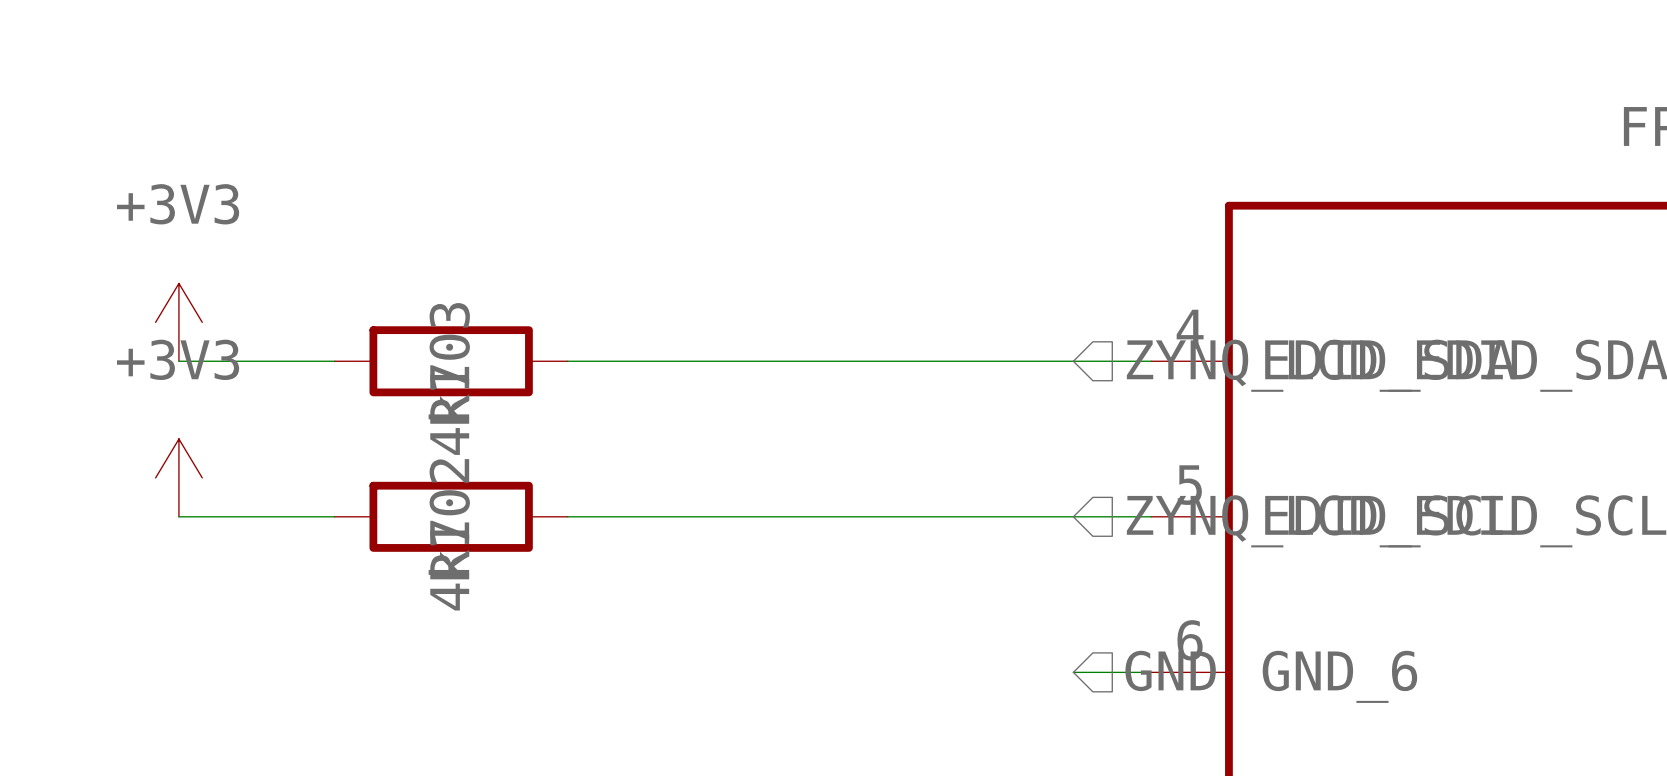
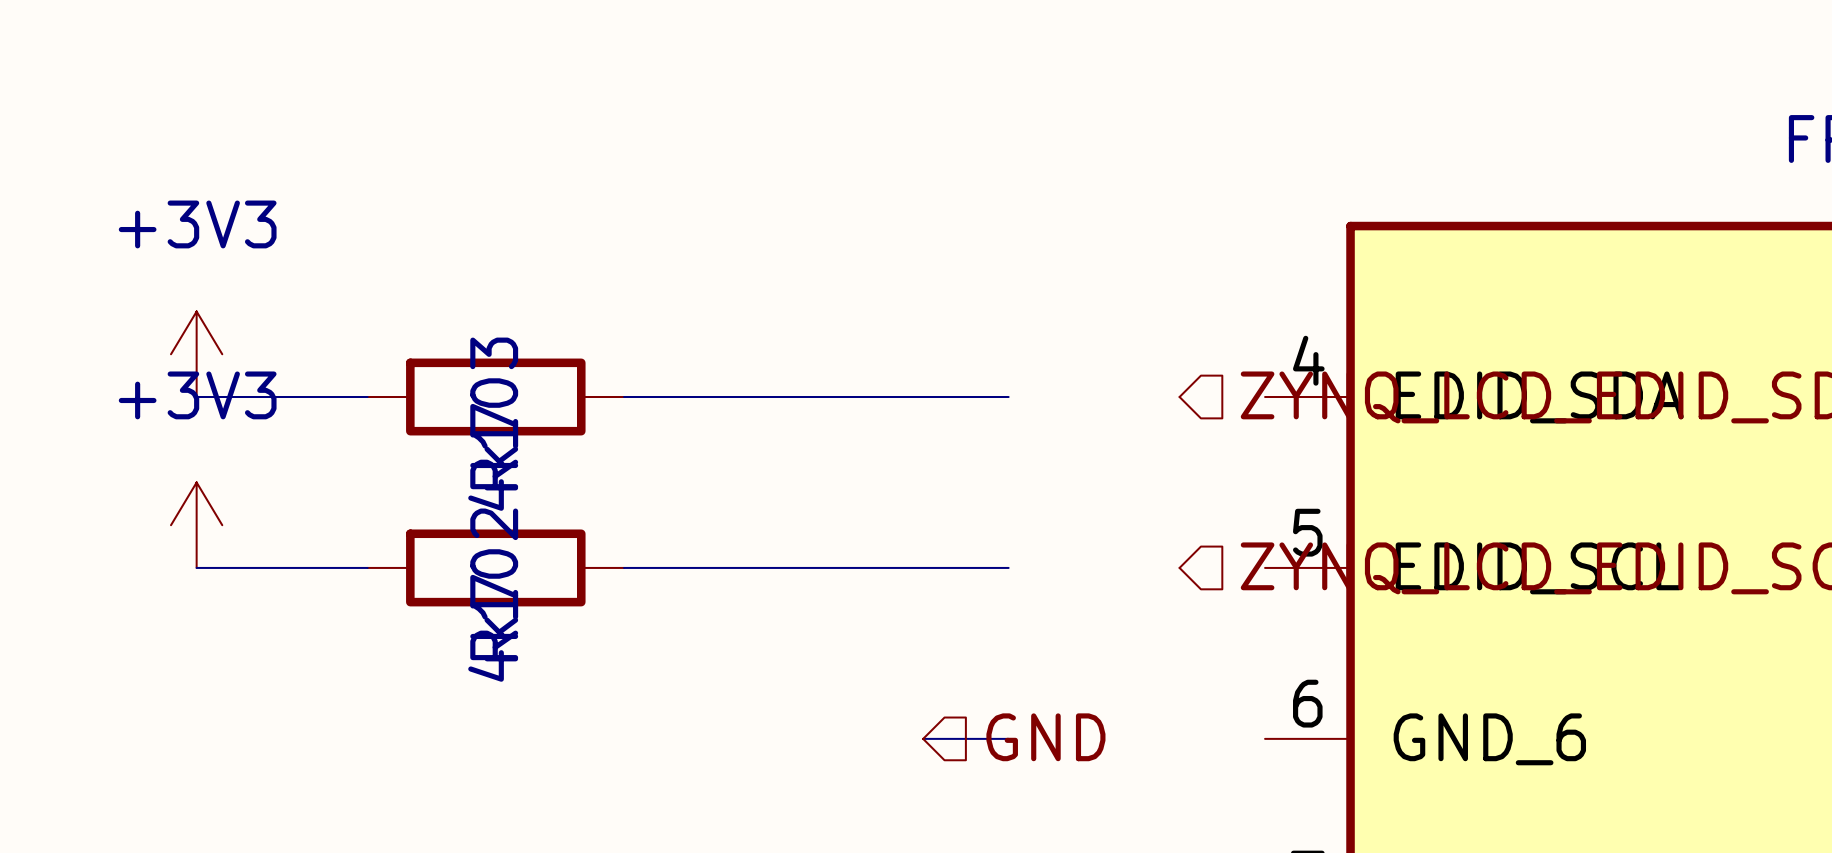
wire: (917, 361) (1151, 361) -> none
wire: (917, 516) (1151, 516) -> none
hierarchical label position: GND (1170, 670) -> GND (1045, 737)
wire: (1073, 672) (1151, 672) -> (923, 738) (1008, 738)

